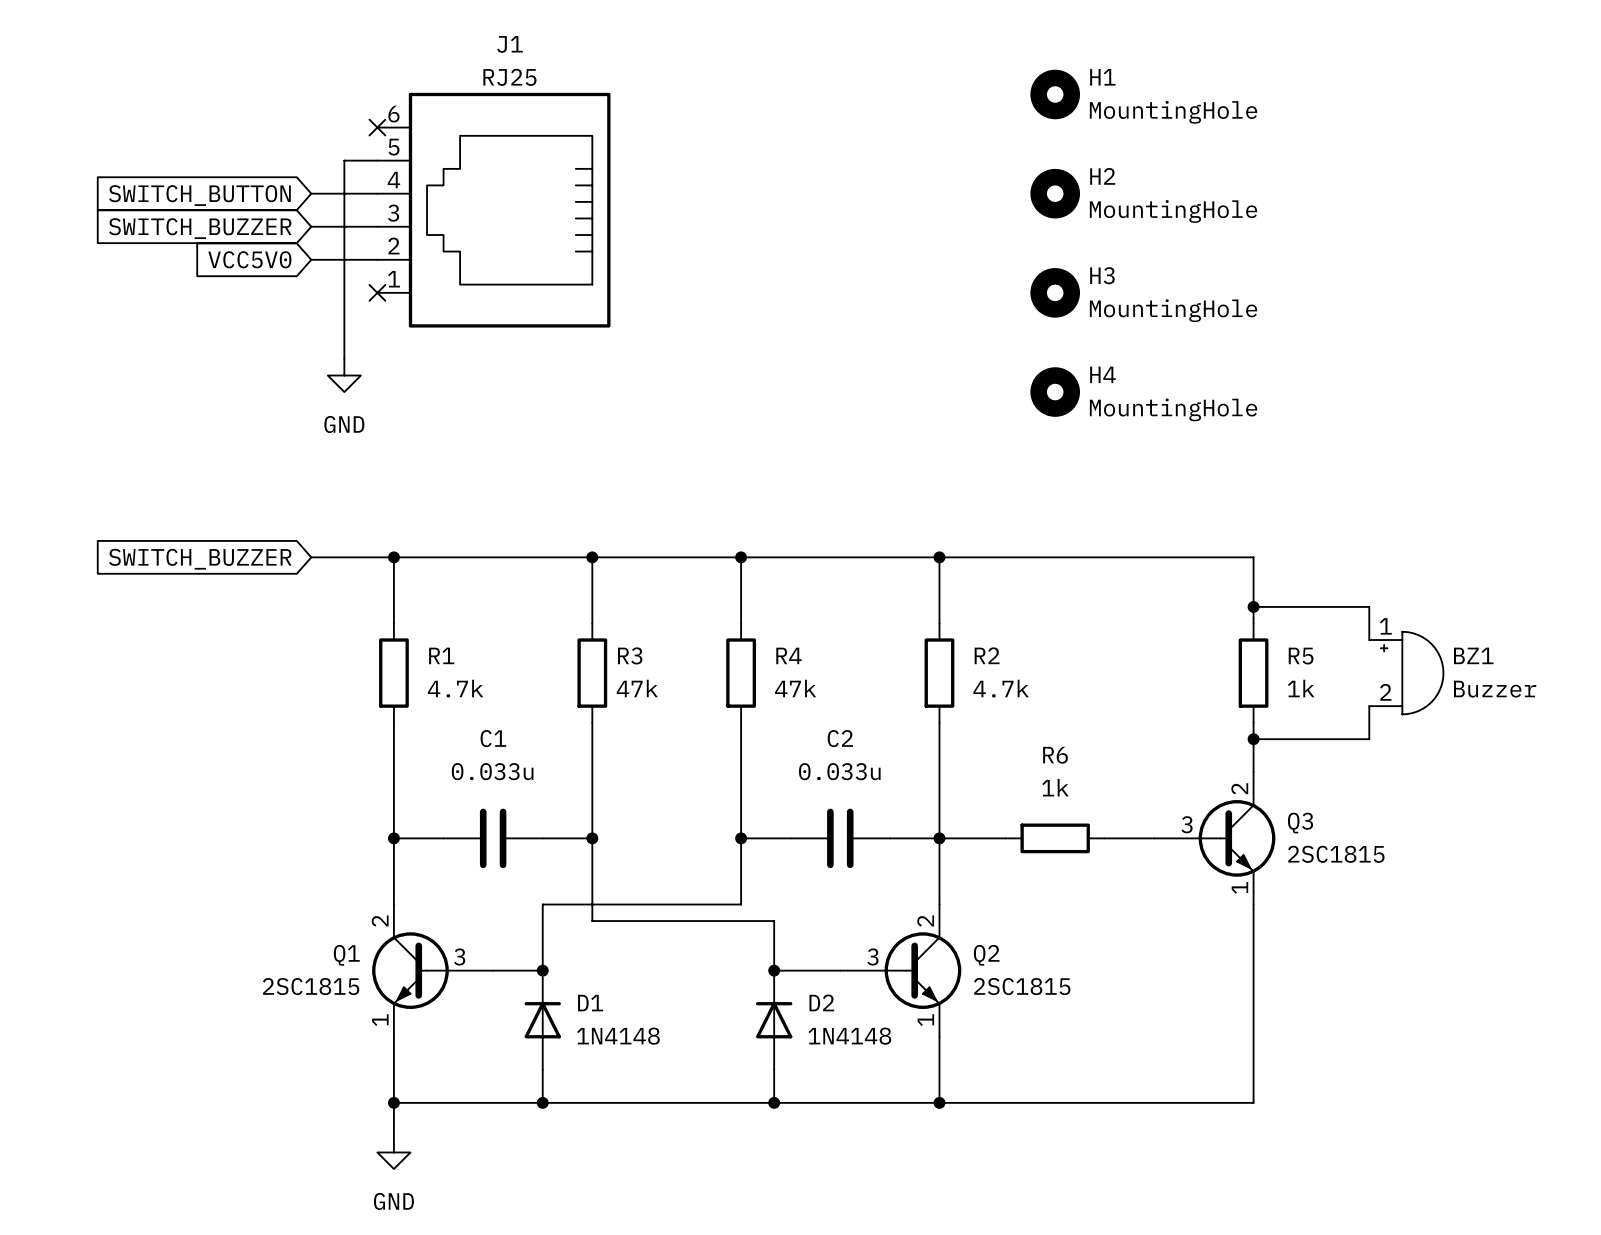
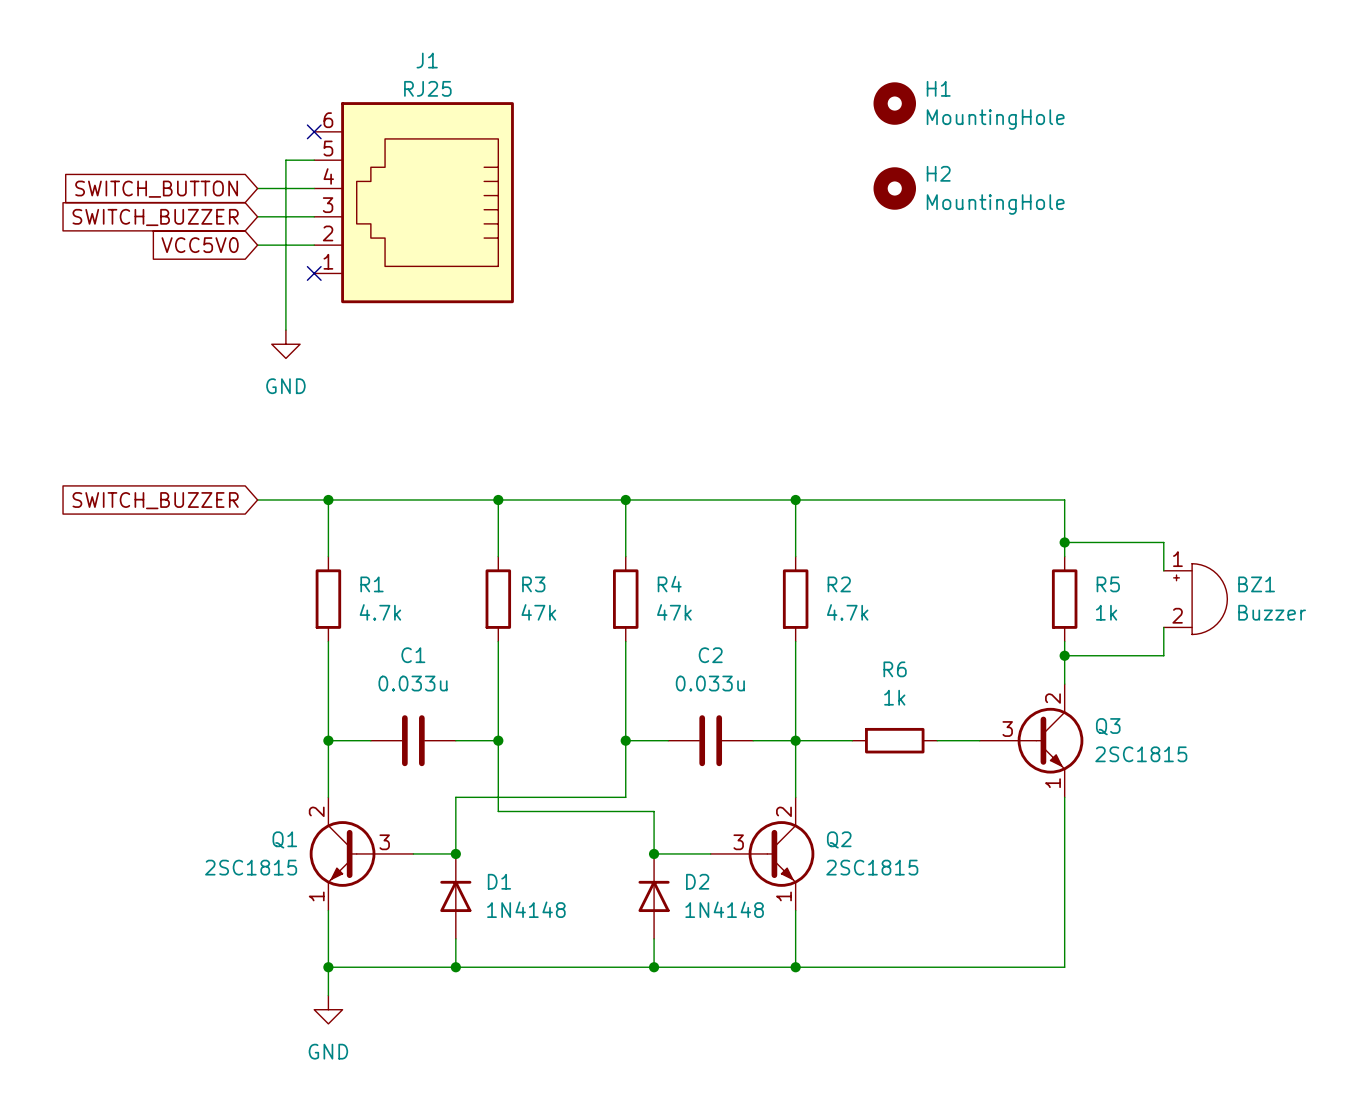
H3: MountingHole (1055, 292) -> none
H4: MountingHole (1055, 392) -> none

